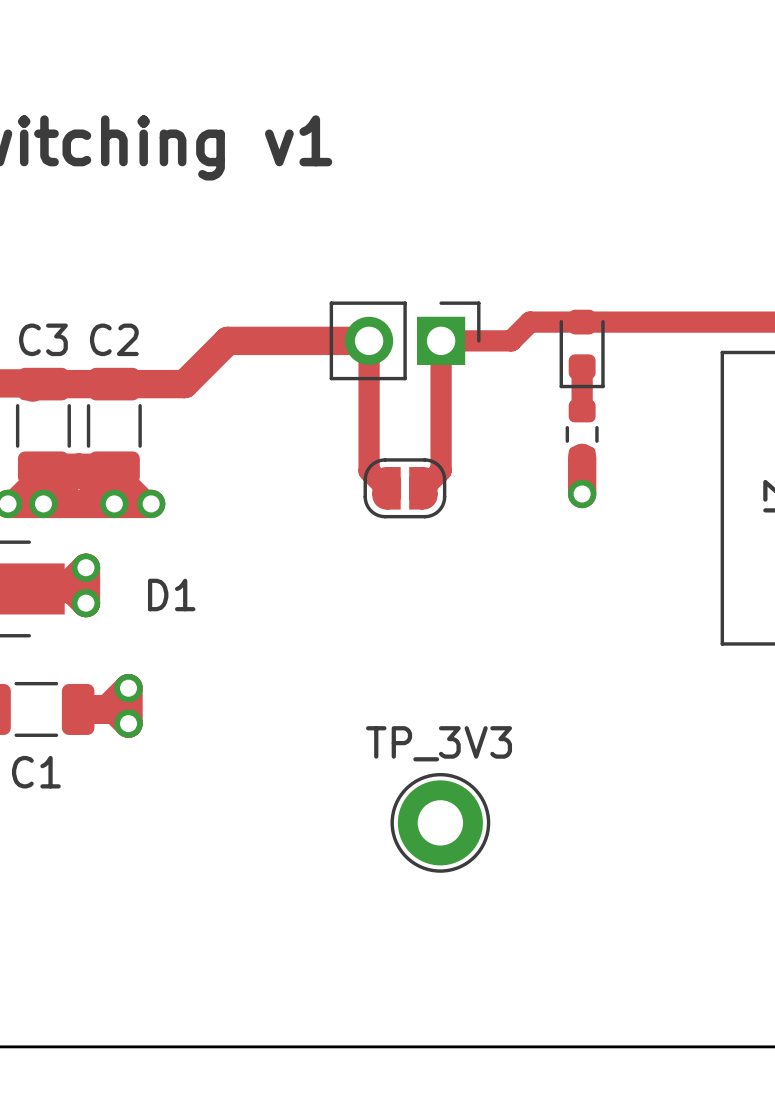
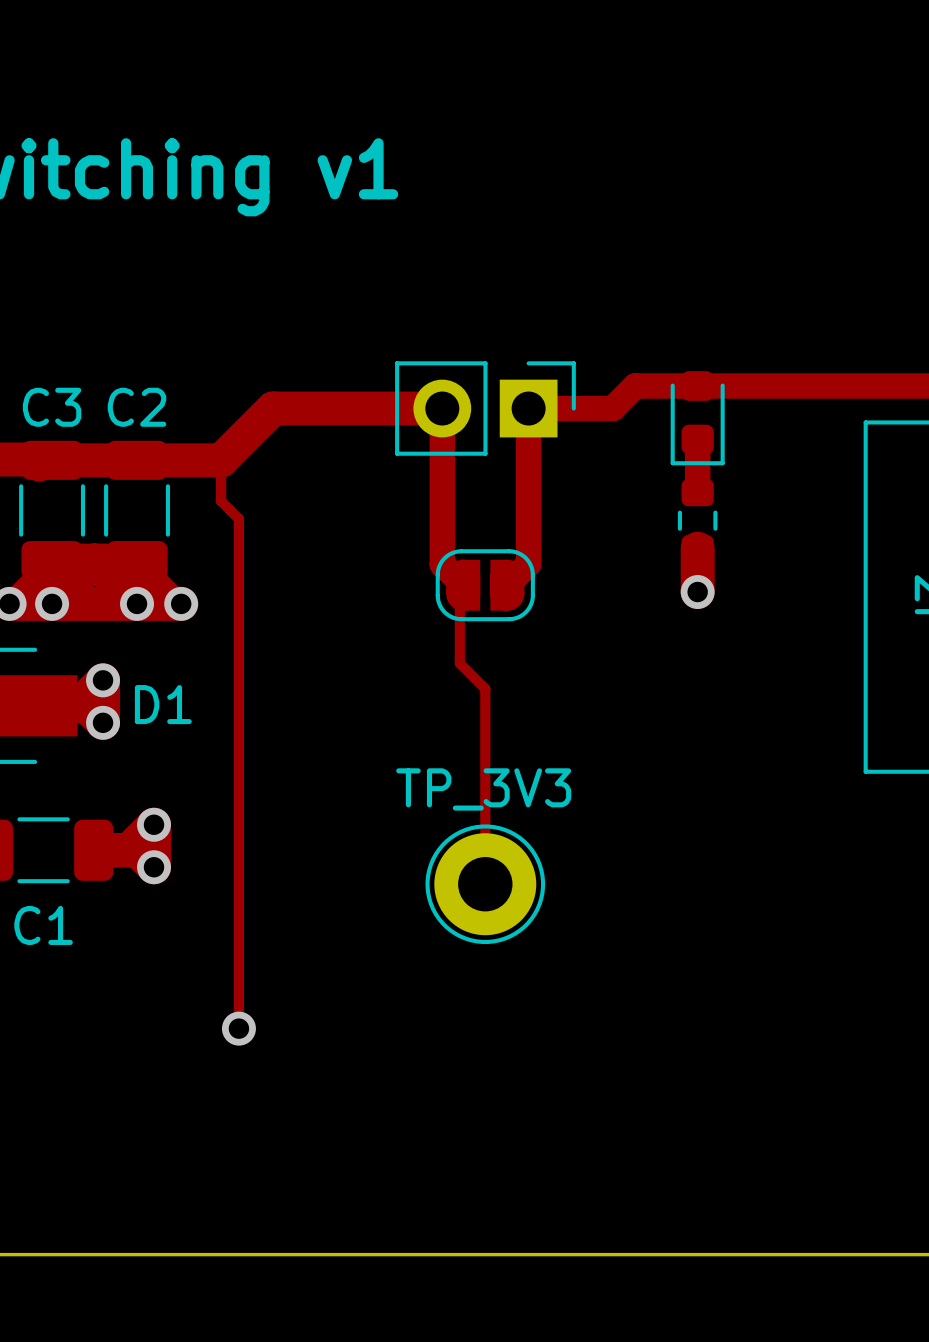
track: none -> (221, 460) (221, 501) (238, 518) (238, 1028)
track: none -> (463, 585) (459, 588) (459, 663) (485, 688) (485, 884)
D1 name position: D1 (171, 594) -> D1 (163, 704)
part position: (440, 822) -> (485, 884)
via: none -> (238, 1028)

